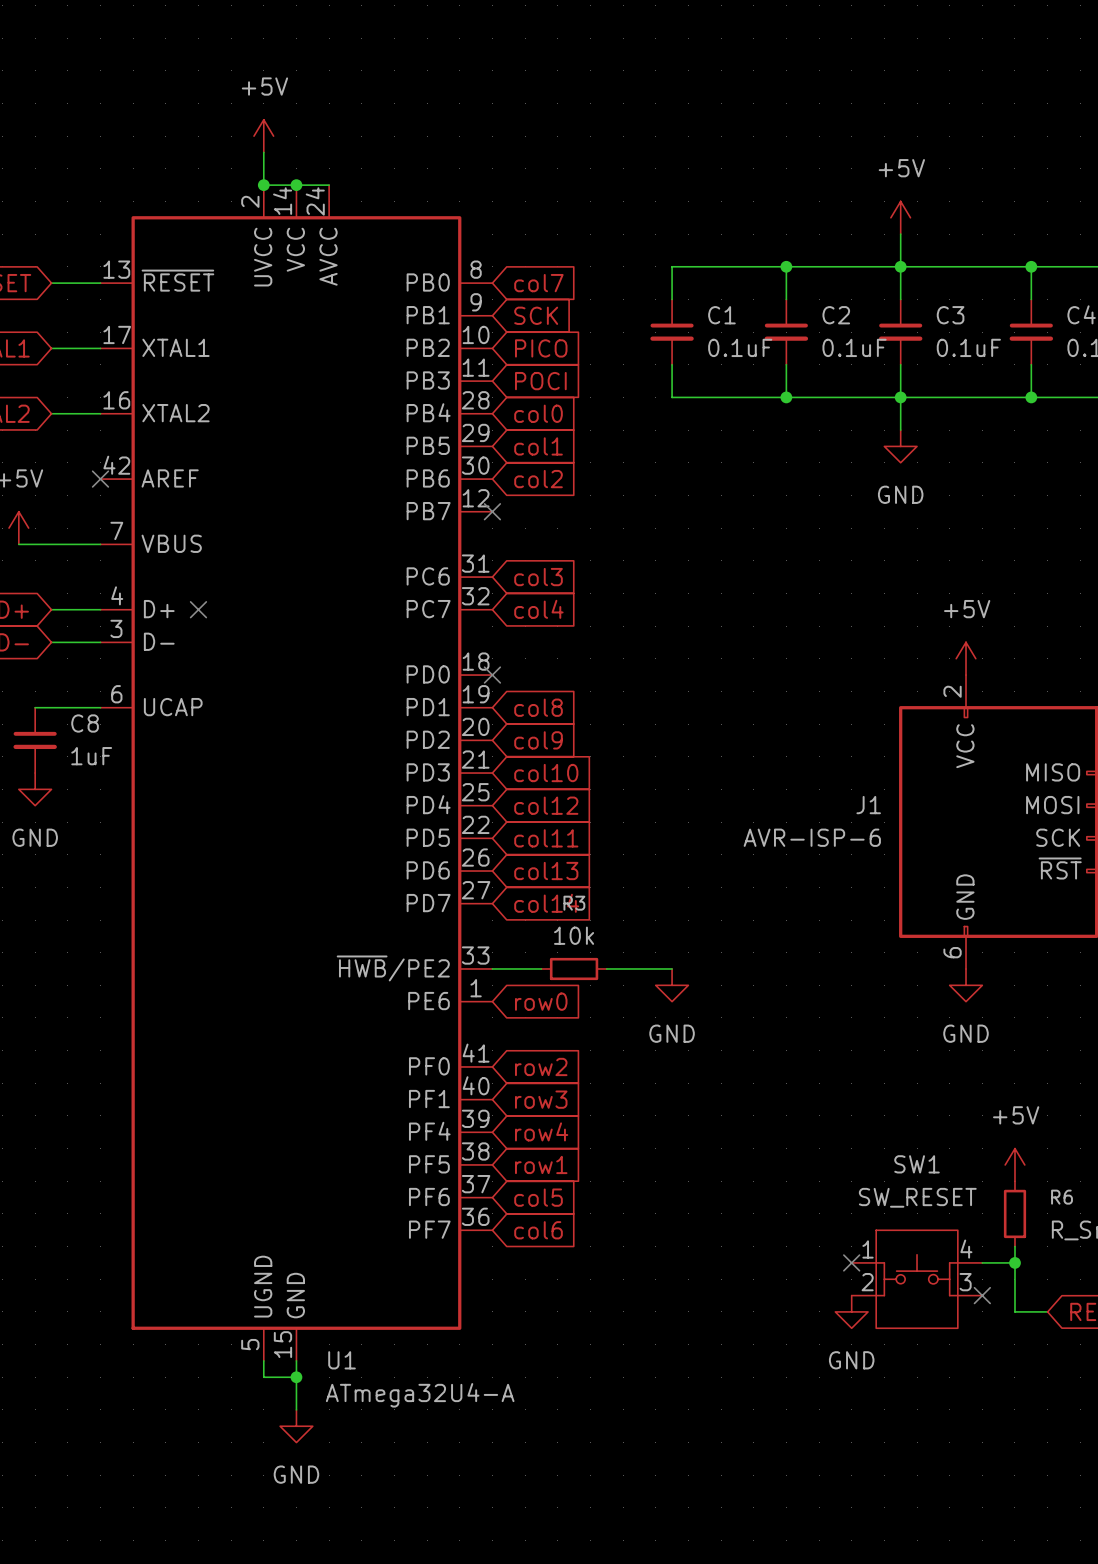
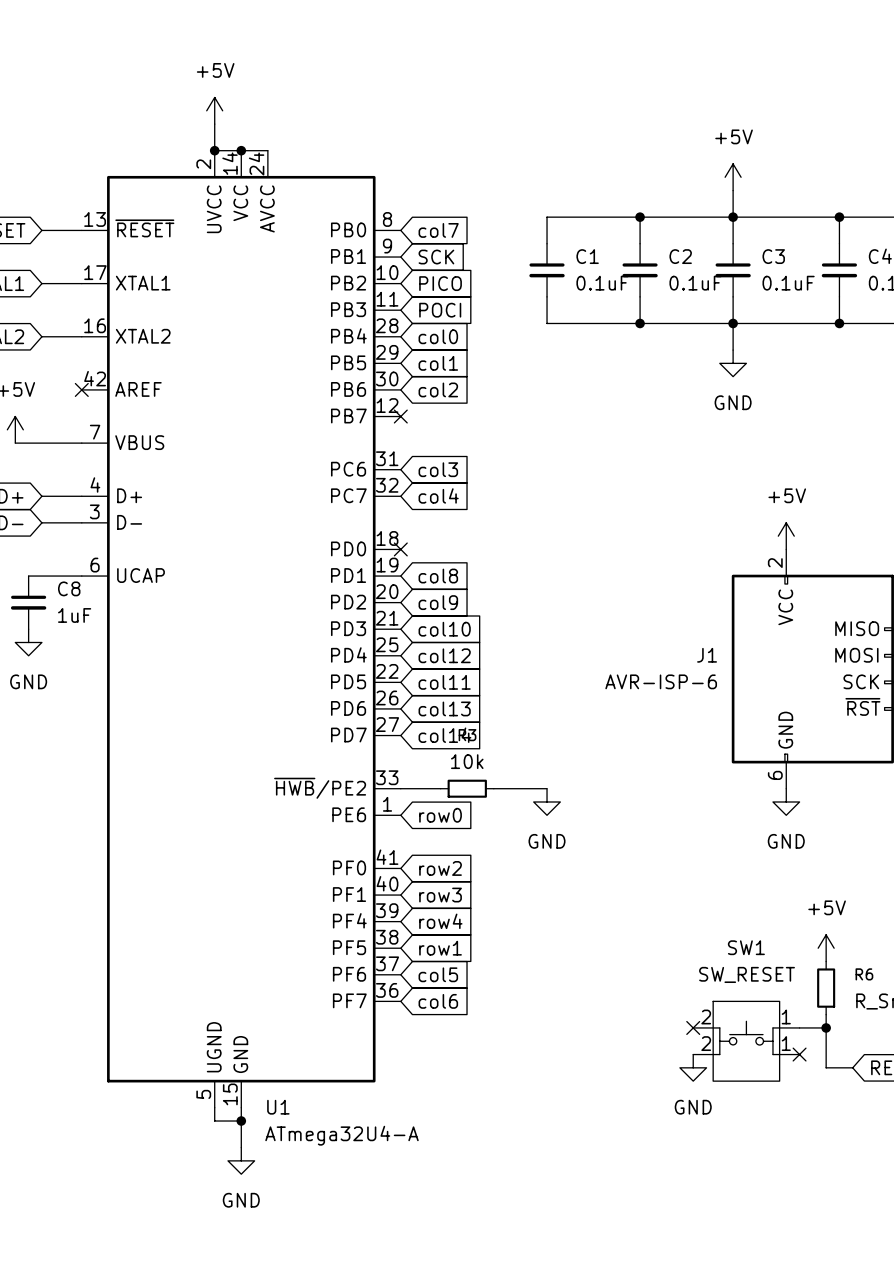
no-connect mark: (198, 609) -> none
SW1 pin number: 1 (868, 1249) -> 2 (706, 1017)
SW1 pin number: 4 (966, 1249) -> 1 (786, 1017)
SW1 pin number: 3 (965, 1282) -> 1 (786, 1043)

